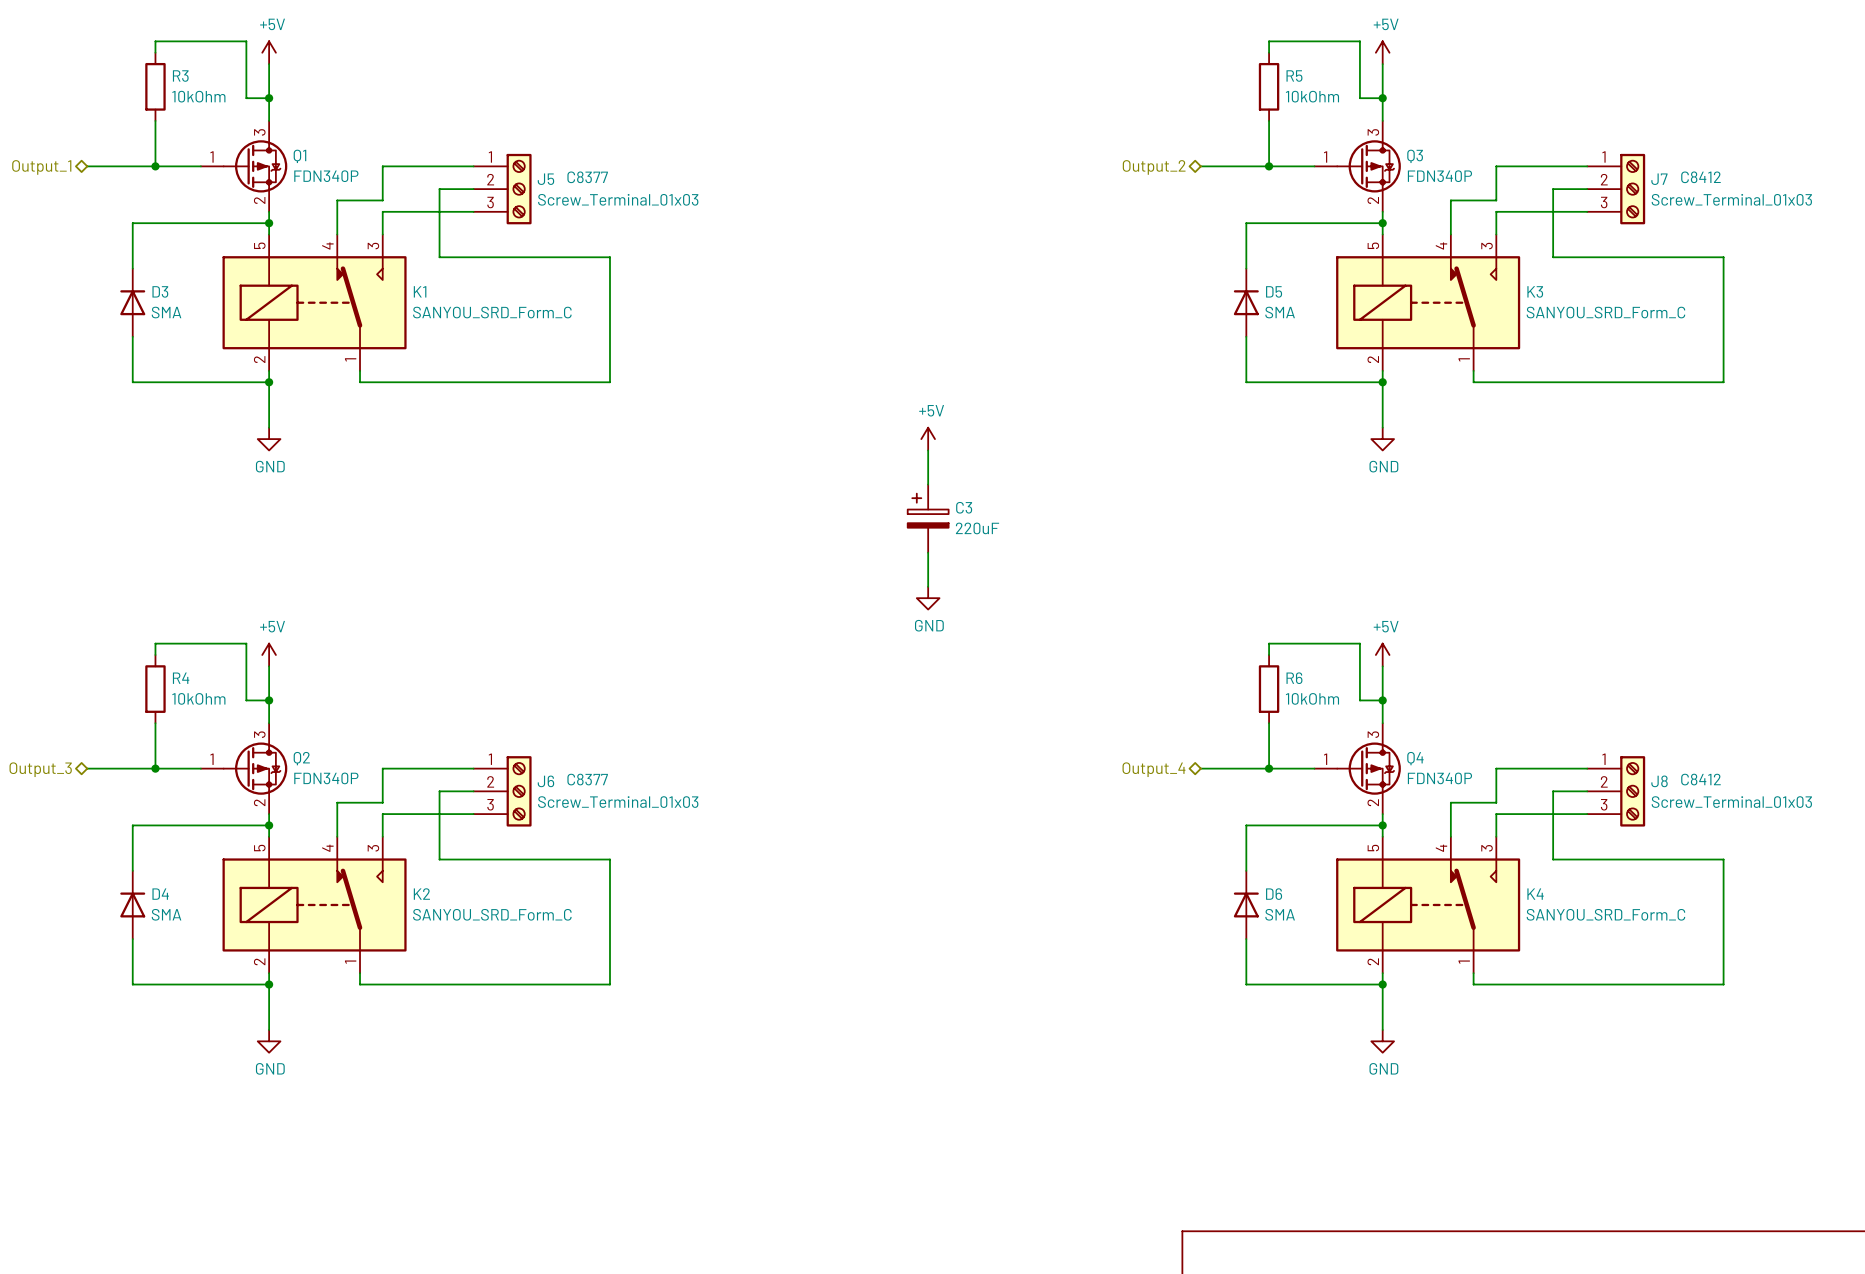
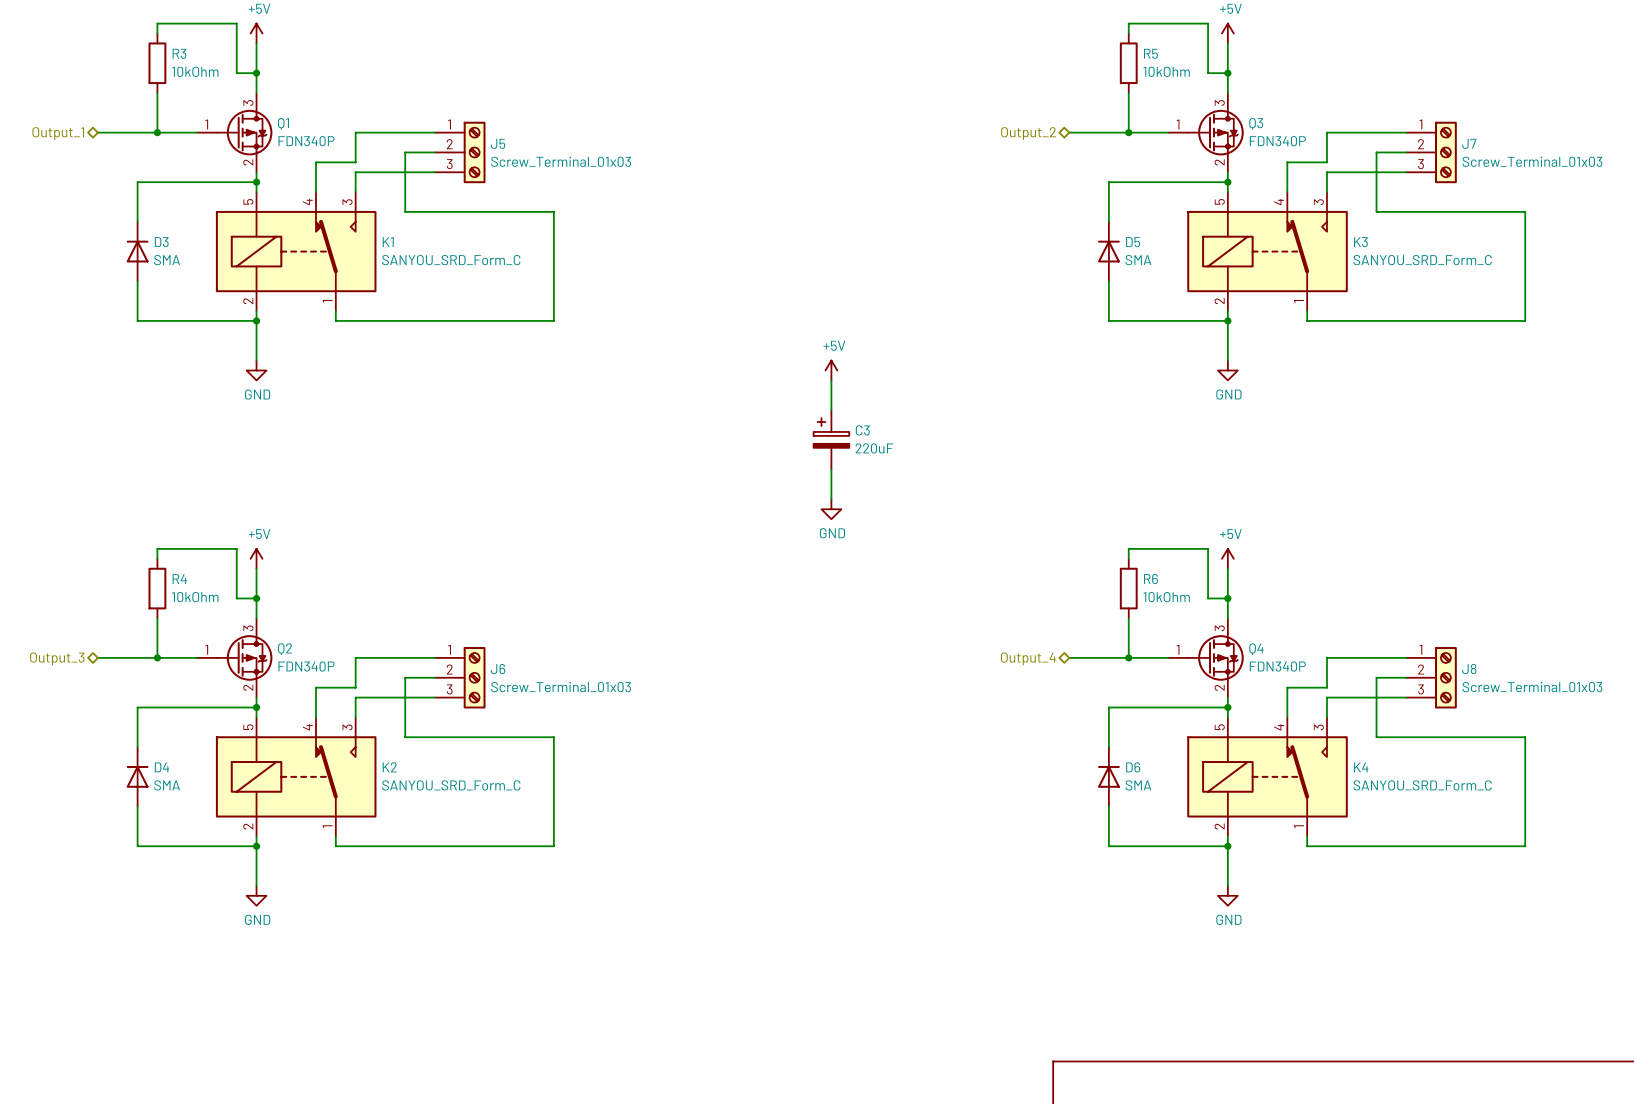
J5 text: C8377 (587, 177) -> none
J7 text: C8412 (1700, 177) -> none
J6 text: C8377 (587, 779) -> none
J8 text: C8412 (1700, 779) -> none

